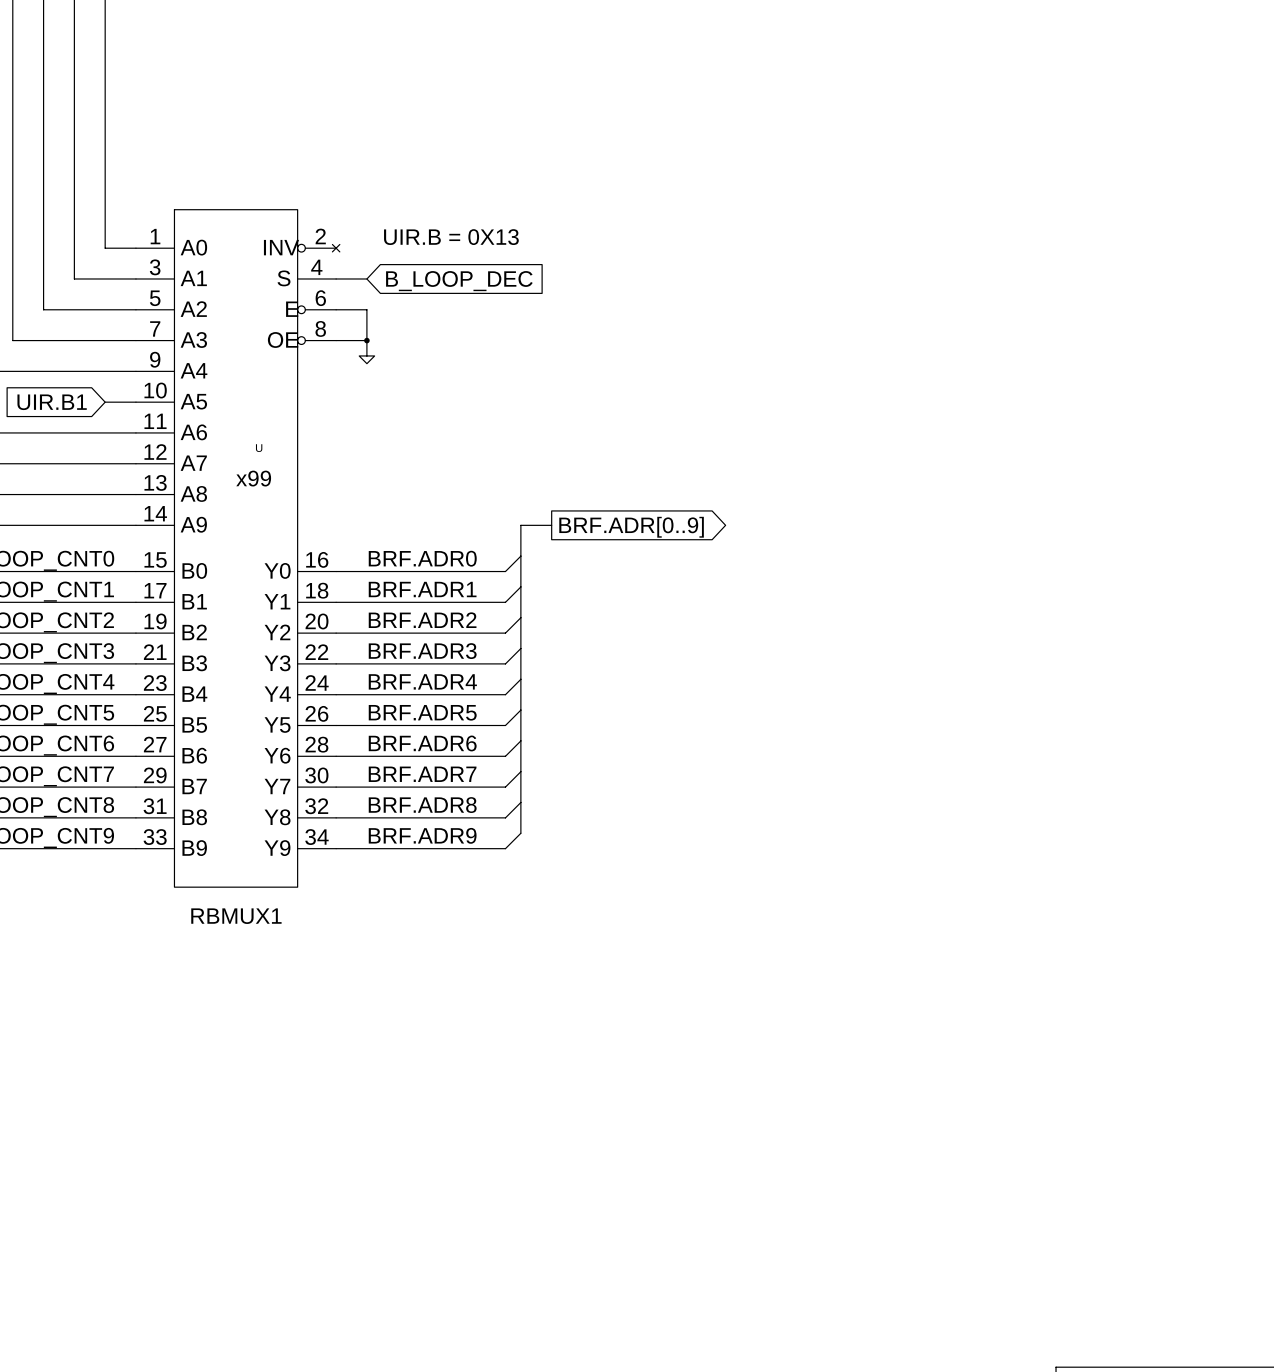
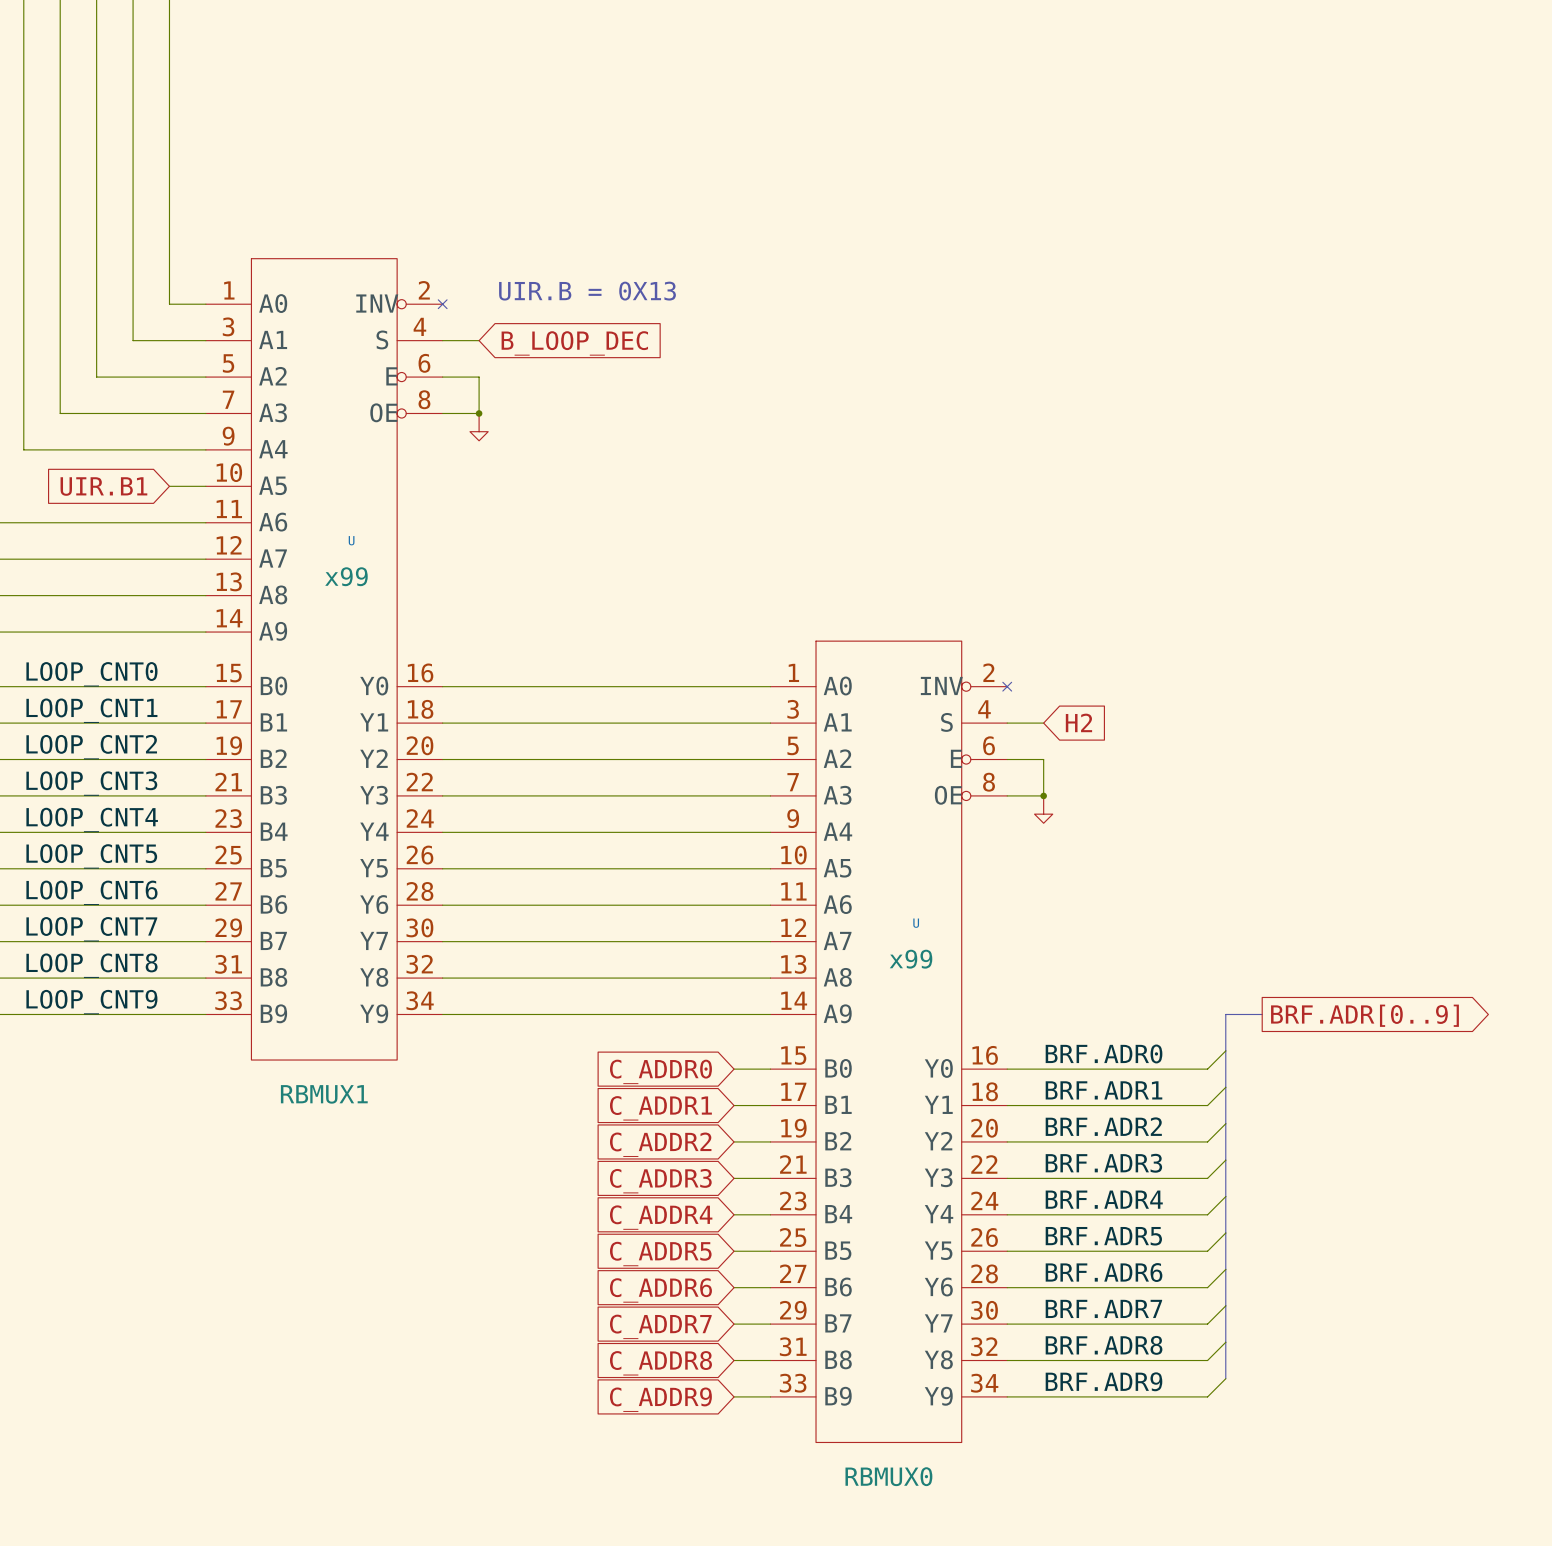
bus: (551, 525) (520, 525) (520, 833) -> none
global label: BRF.ADR[0..9] (631, 527) -> none
wire: (520, 556) (505, 571) -> (770, 686) (642, 686)
label: BRF.ADR0 (422, 558) -> none
no-connect mark: none -> (1007, 686)
wire: (520, 586) (505, 602) -> (770, 723) (642, 723)
label: BRF.ADR1 (422, 589) -> none
wire: none -> (1007, 723) (1043, 723)
global label: none -> H2 (1078, 722)
wire: (520, 617) (505, 633) -> (770, 759) (642, 759)
label: BRF.ADR2 (422, 620) -> none
wire: none -> (1007, 759) (1043, 759) (1043, 795) (1007, 795)
wire: (520, 648) (505, 663) -> (770, 795) (642, 795)
label: BRF.ADR3 (422, 651) -> none
junction: none -> (1043, 795)
power symbol: none -> (1043, 809)
wire: (520, 679) (505, 694) -> (770, 832) (642, 832)
label: BRF.ADR4 (422, 681) -> none
wire: (520, 710) (505, 725) -> (770, 868) (642, 868)
label: BRF.ADR5 (422, 712) -> none
wire: (520, 740) (505, 756) -> (770, 905) (642, 905)
label: BRF.ADR6 (422, 743) -> none
wire: (520, 771) (505, 787) -> (770, 941) (642, 941)
label: BRF.ADR7 (422, 774) -> none
wire: (520, 802) (505, 817) -> (770, 978) (642, 978)
label: BRF.ADR8 (422, 805) -> none
wire: (520, 833) (505, 848) -> (770, 1014) (642, 1014)
label: BRF.ADR9 (422, 835) -> none
bus: none -> (1262, 1014) (1225, 1014) (1225, 1378)
global label: none -> BRF.ADR[0..9] (1364, 1015)
U: none -> (888, 1041)
wire: none -> (1225, 1050) (1207, 1069) (1007, 1069)
label: none -> BRF.ADR0 (1104, 1053)
wire: none -> (734, 1069) (770, 1069)
global label: none -> C_ADDR0 (660, 1071)
wire: none -> (1225, 1087) (1207, 1105) (1007, 1105)
label: none -> BRF.ADR1 (1103, 1090)
wire: none -> (734, 1105) (770, 1105)
global label: none -> C_ADDR1 (660, 1108)
wire: none -> (1225, 1123) (1207, 1141) (1007, 1141)
label: none -> BRF.ADR2 (1103, 1126)
wire: none -> (734, 1141) (770, 1141)
global label: none -> C_ADDR2 (660, 1144)
wire: none -> (1225, 1160) (1207, 1178) (1007, 1178)
label: none -> BRF.ADR3 (1103, 1163)
wire: none -> (734, 1178) (770, 1178)
global label: none -> C_ADDR3 (660, 1181)
wire: none -> (1225, 1196) (1207, 1214) (1007, 1214)
label: none -> BRF.ADR4 (1104, 1199)
wire: none -> (734, 1214) (770, 1214)
global label: none -> C_ADDR4 (661, 1217)
wire: none -> (1225, 1233) (1207, 1251) (1007, 1251)
label: none -> BRF.ADR5 (1103, 1236)
wire: none -> (734, 1251) (770, 1251)
global label: none -> C_ADDR5 (660, 1254)
wire: none -> (1225, 1269) (1207, 1287) (1007, 1287)
label: none -> BRF.ADR6 (1104, 1272)
wire: none -> (734, 1287) (770, 1287)
global label: none -> C_ADDR6 (660, 1290)
wire: none -> (1225, 1305) (1207, 1324) (1007, 1324)
label: none -> BRF.ADR7 (1103, 1308)
wire: none -> (734, 1324) (770, 1324)
global label: none -> C_ADDR7 (660, 1326)
wire: none -> (1225, 1342) (1207, 1360) (1007, 1360)
label: none -> BRF.ADR8 (1104, 1345)
wire: none -> (734, 1360) (770, 1360)
global label: none -> C_ADDR8 (660, 1363)
wire: none -> (1225, 1378) (1207, 1396) (1007, 1396)
label: none -> BRF.ADR9 (1103, 1381)
wire: none -> (734, 1396) (770, 1396)
global label: none -> C_ADDR9 (660, 1399)

